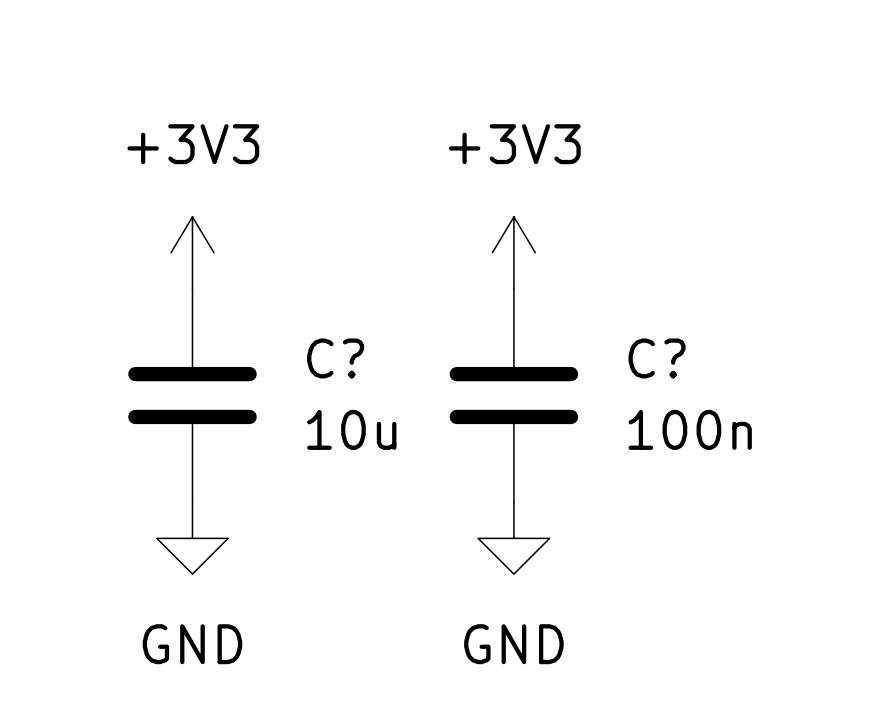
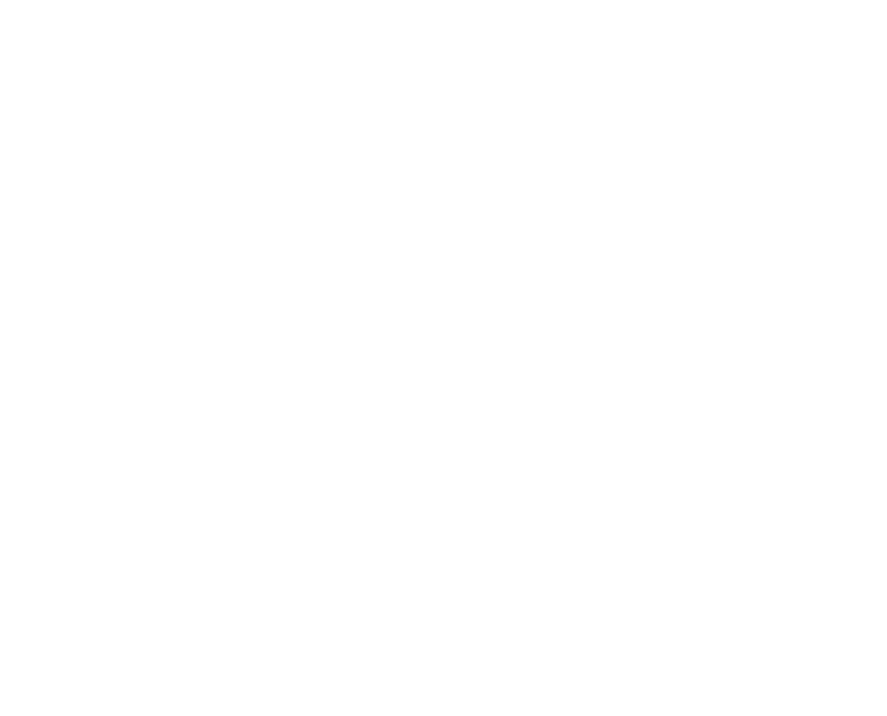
power symbol: +3V3 (192, 252) -> none
power symbol: +3V3 (513, 252) -> none
C?: 10u (192, 395) -> none
C?: 100n (513, 395) -> none
power symbol: GND (192, 538) -> none
power symbol: GND (513, 538) -> none

